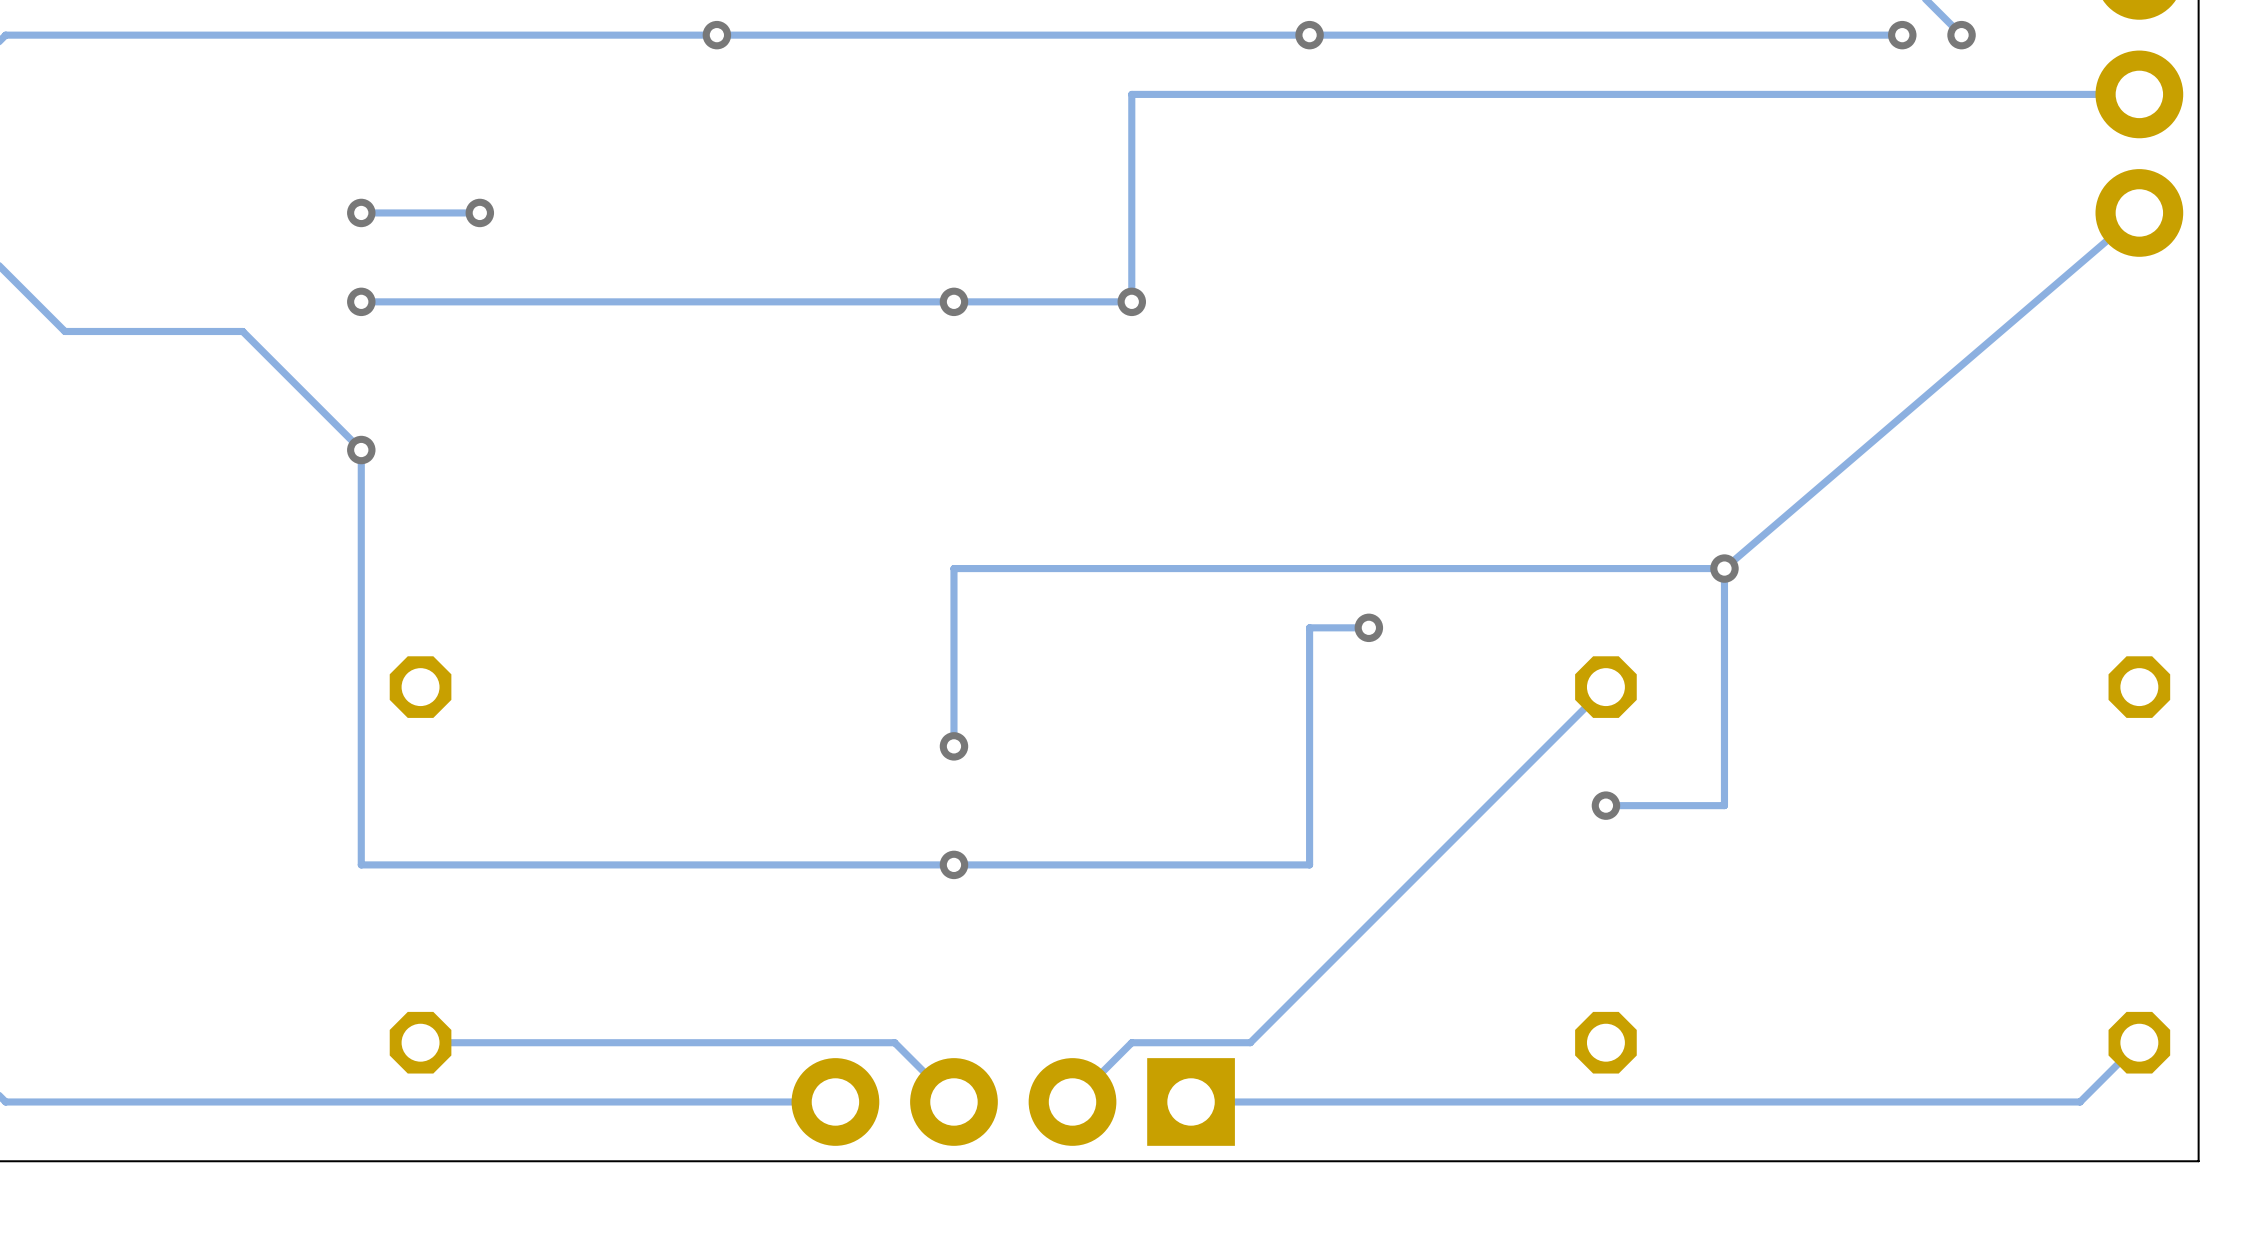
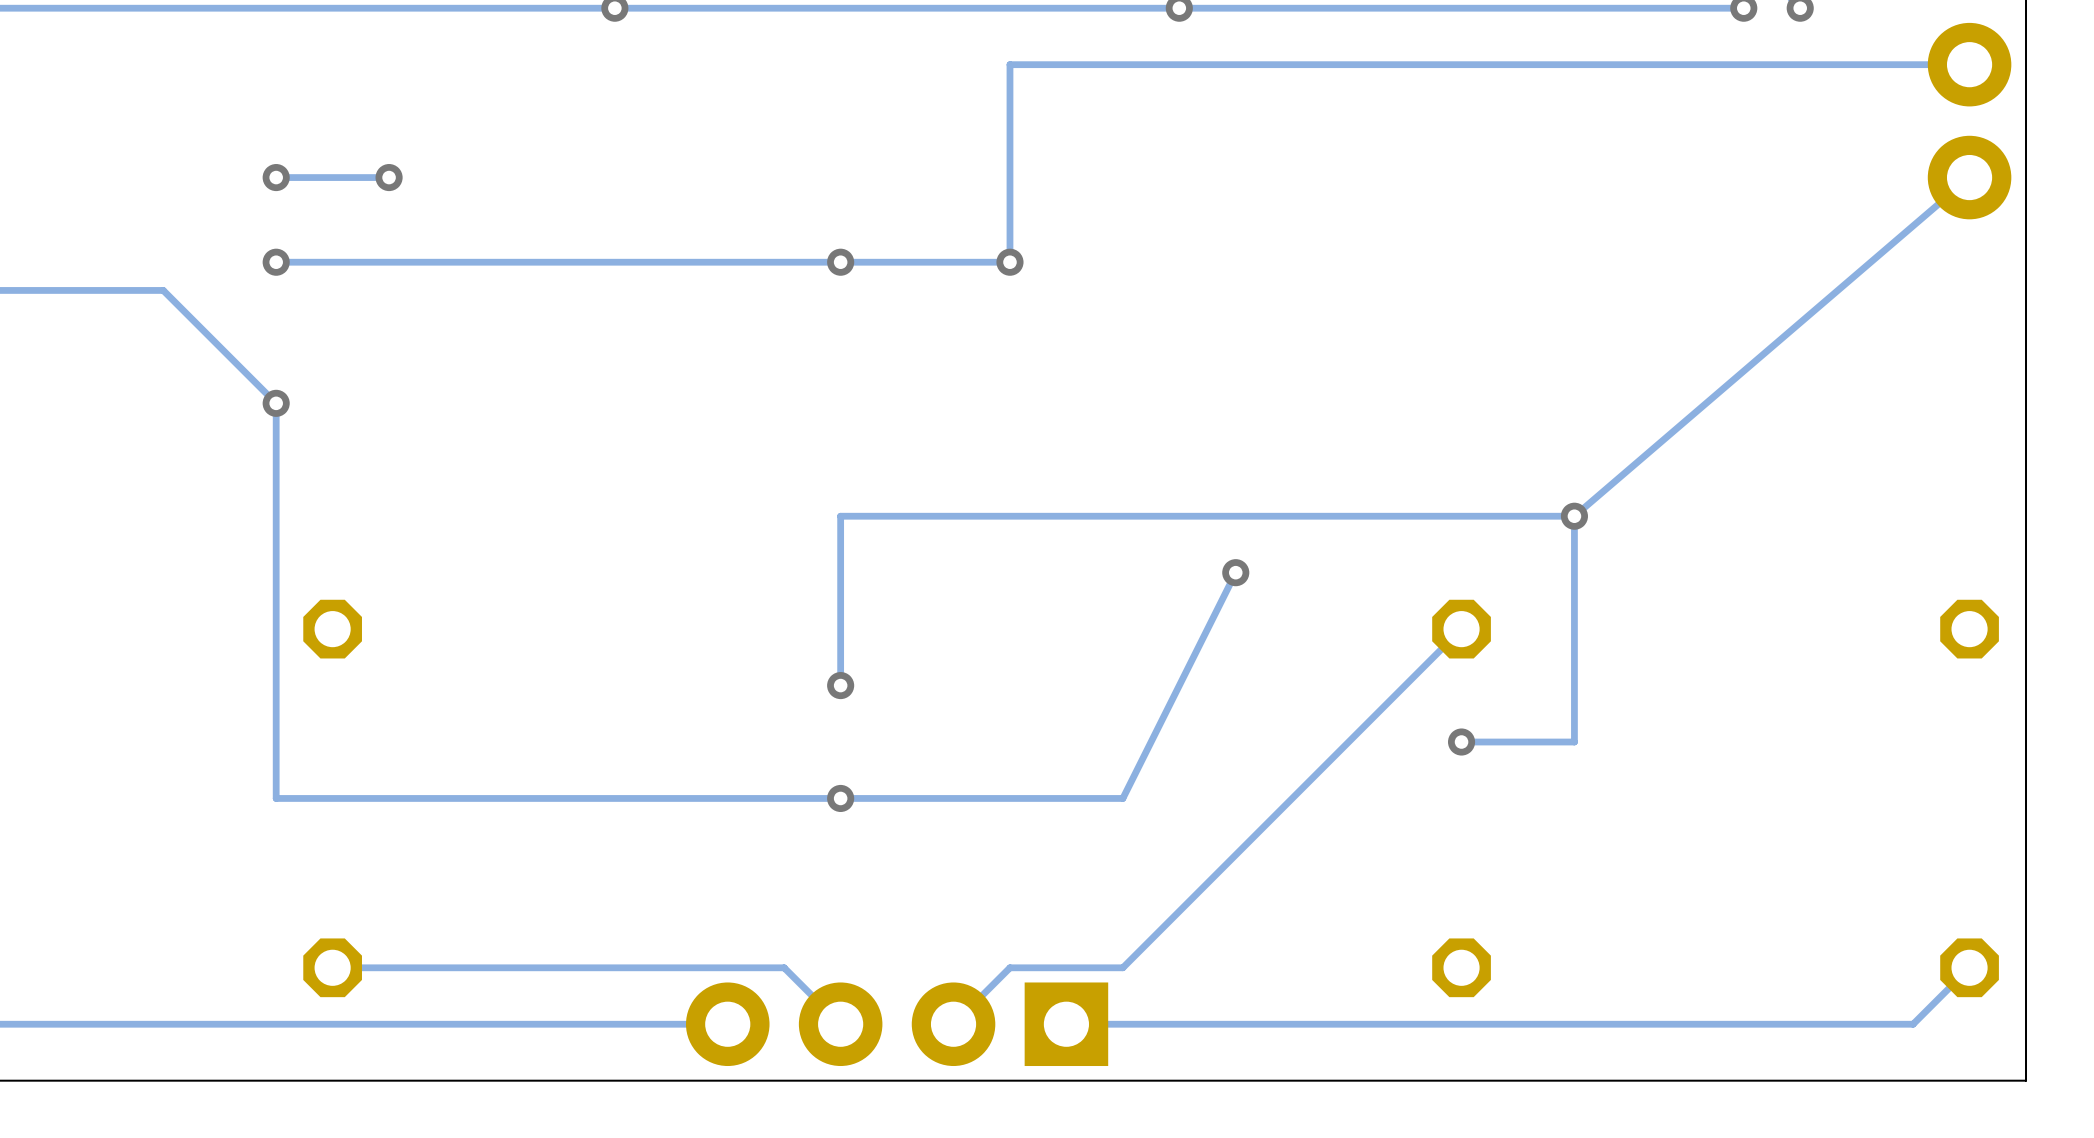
track: (1368, 627) (1309, 627) (1309, 864) (1250, 864) -> (1235, 572) (1122, 798)

